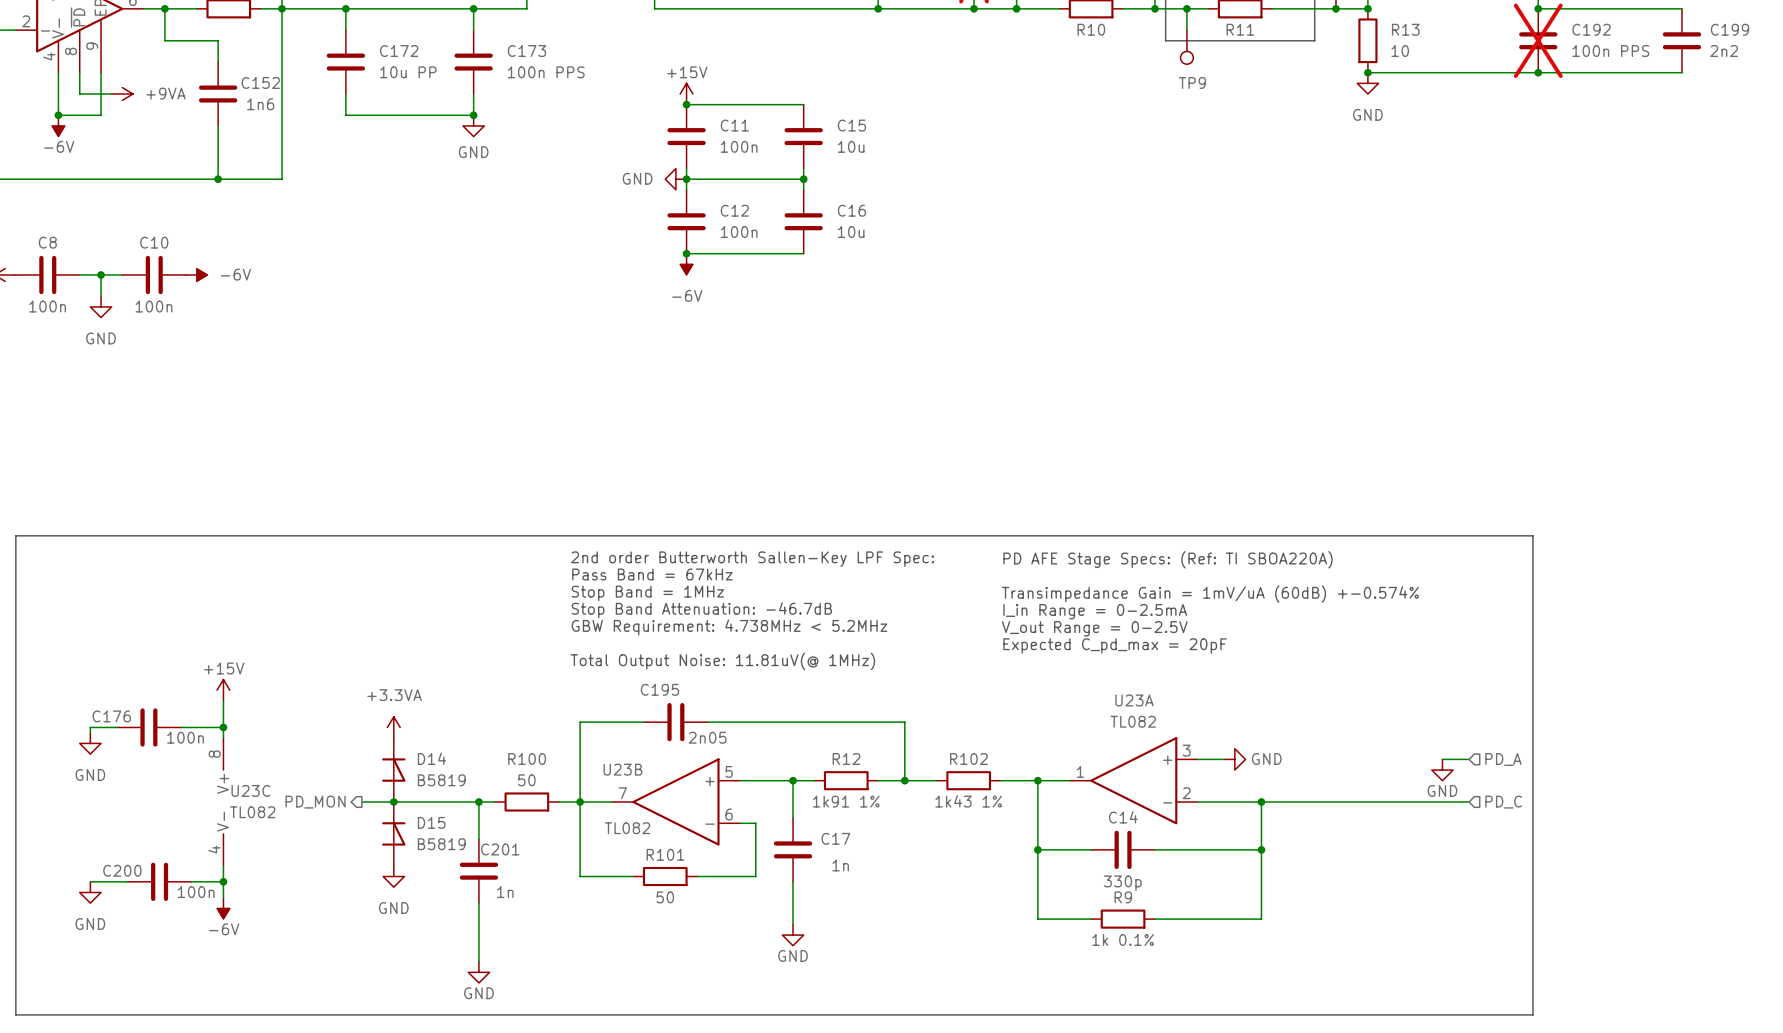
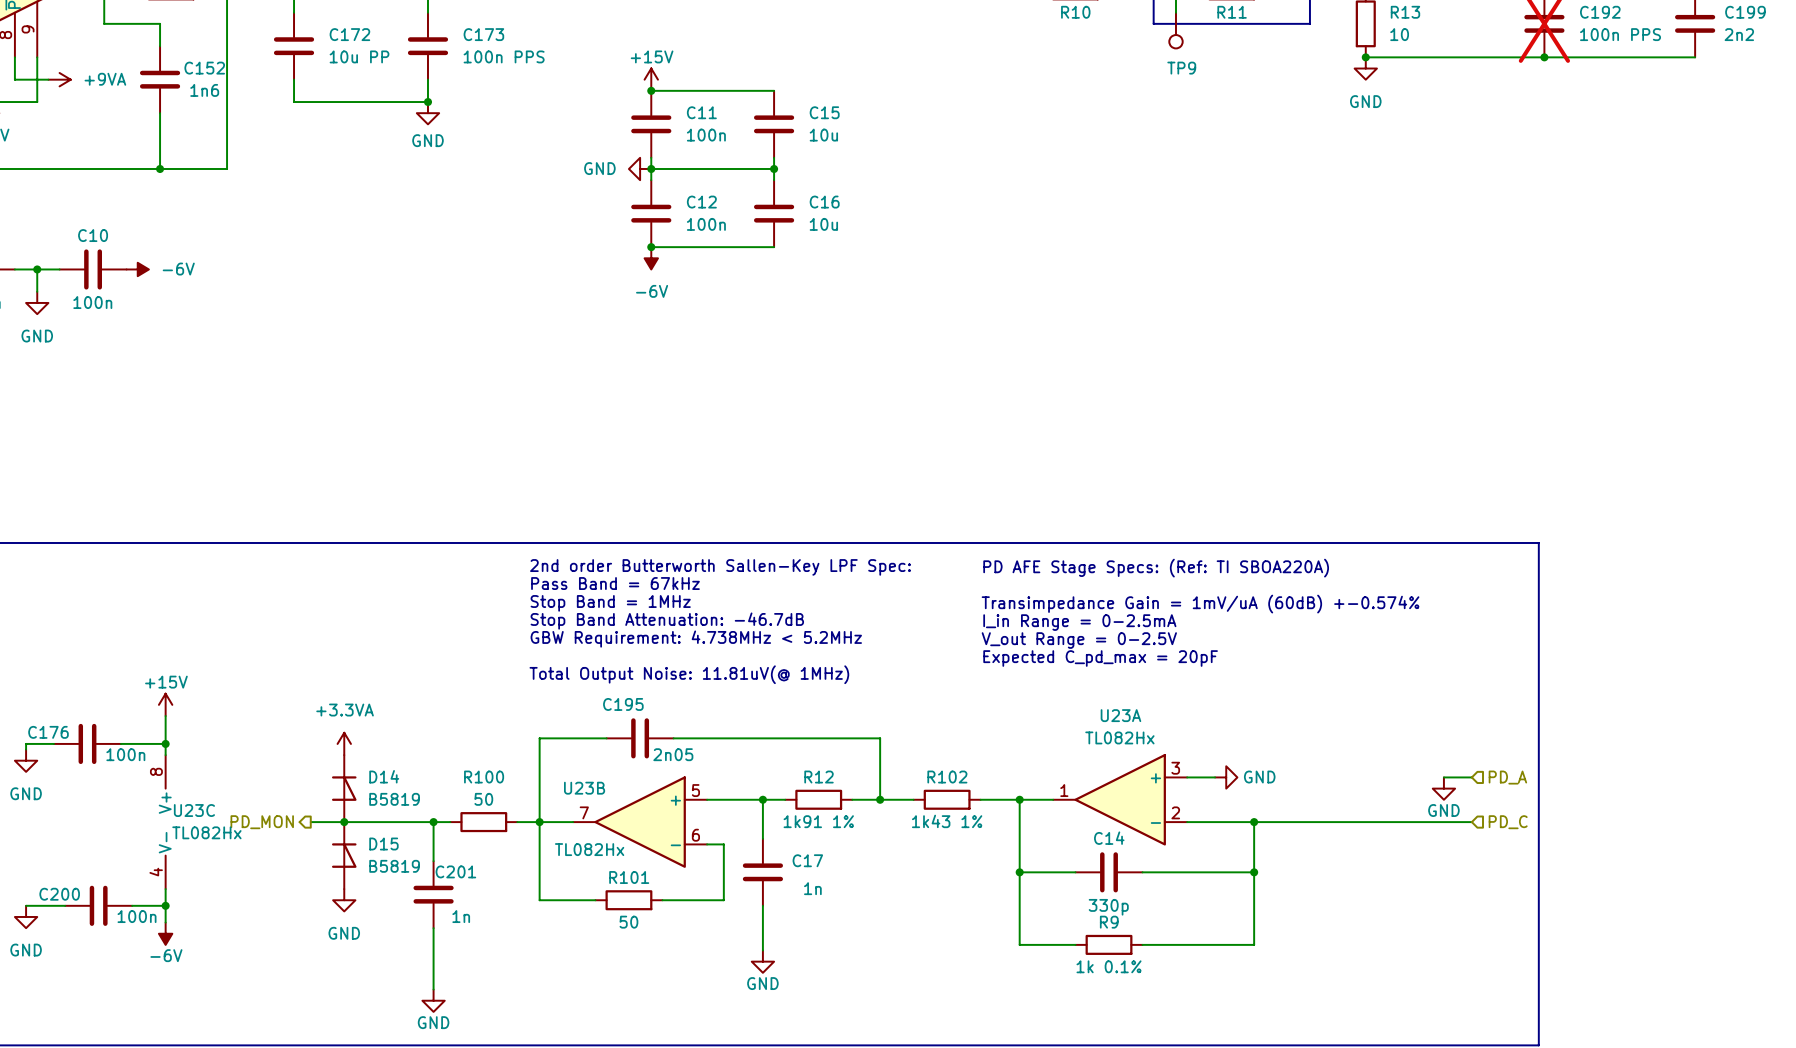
U23A value: TL082 (1133, 721) -> TL082Hx (1119, 737)
U23C value: TL082 (252, 812) -> TL082Hx (206, 832)
U23B value: TL082 (627, 828) -> TL082Hx (589, 849)

